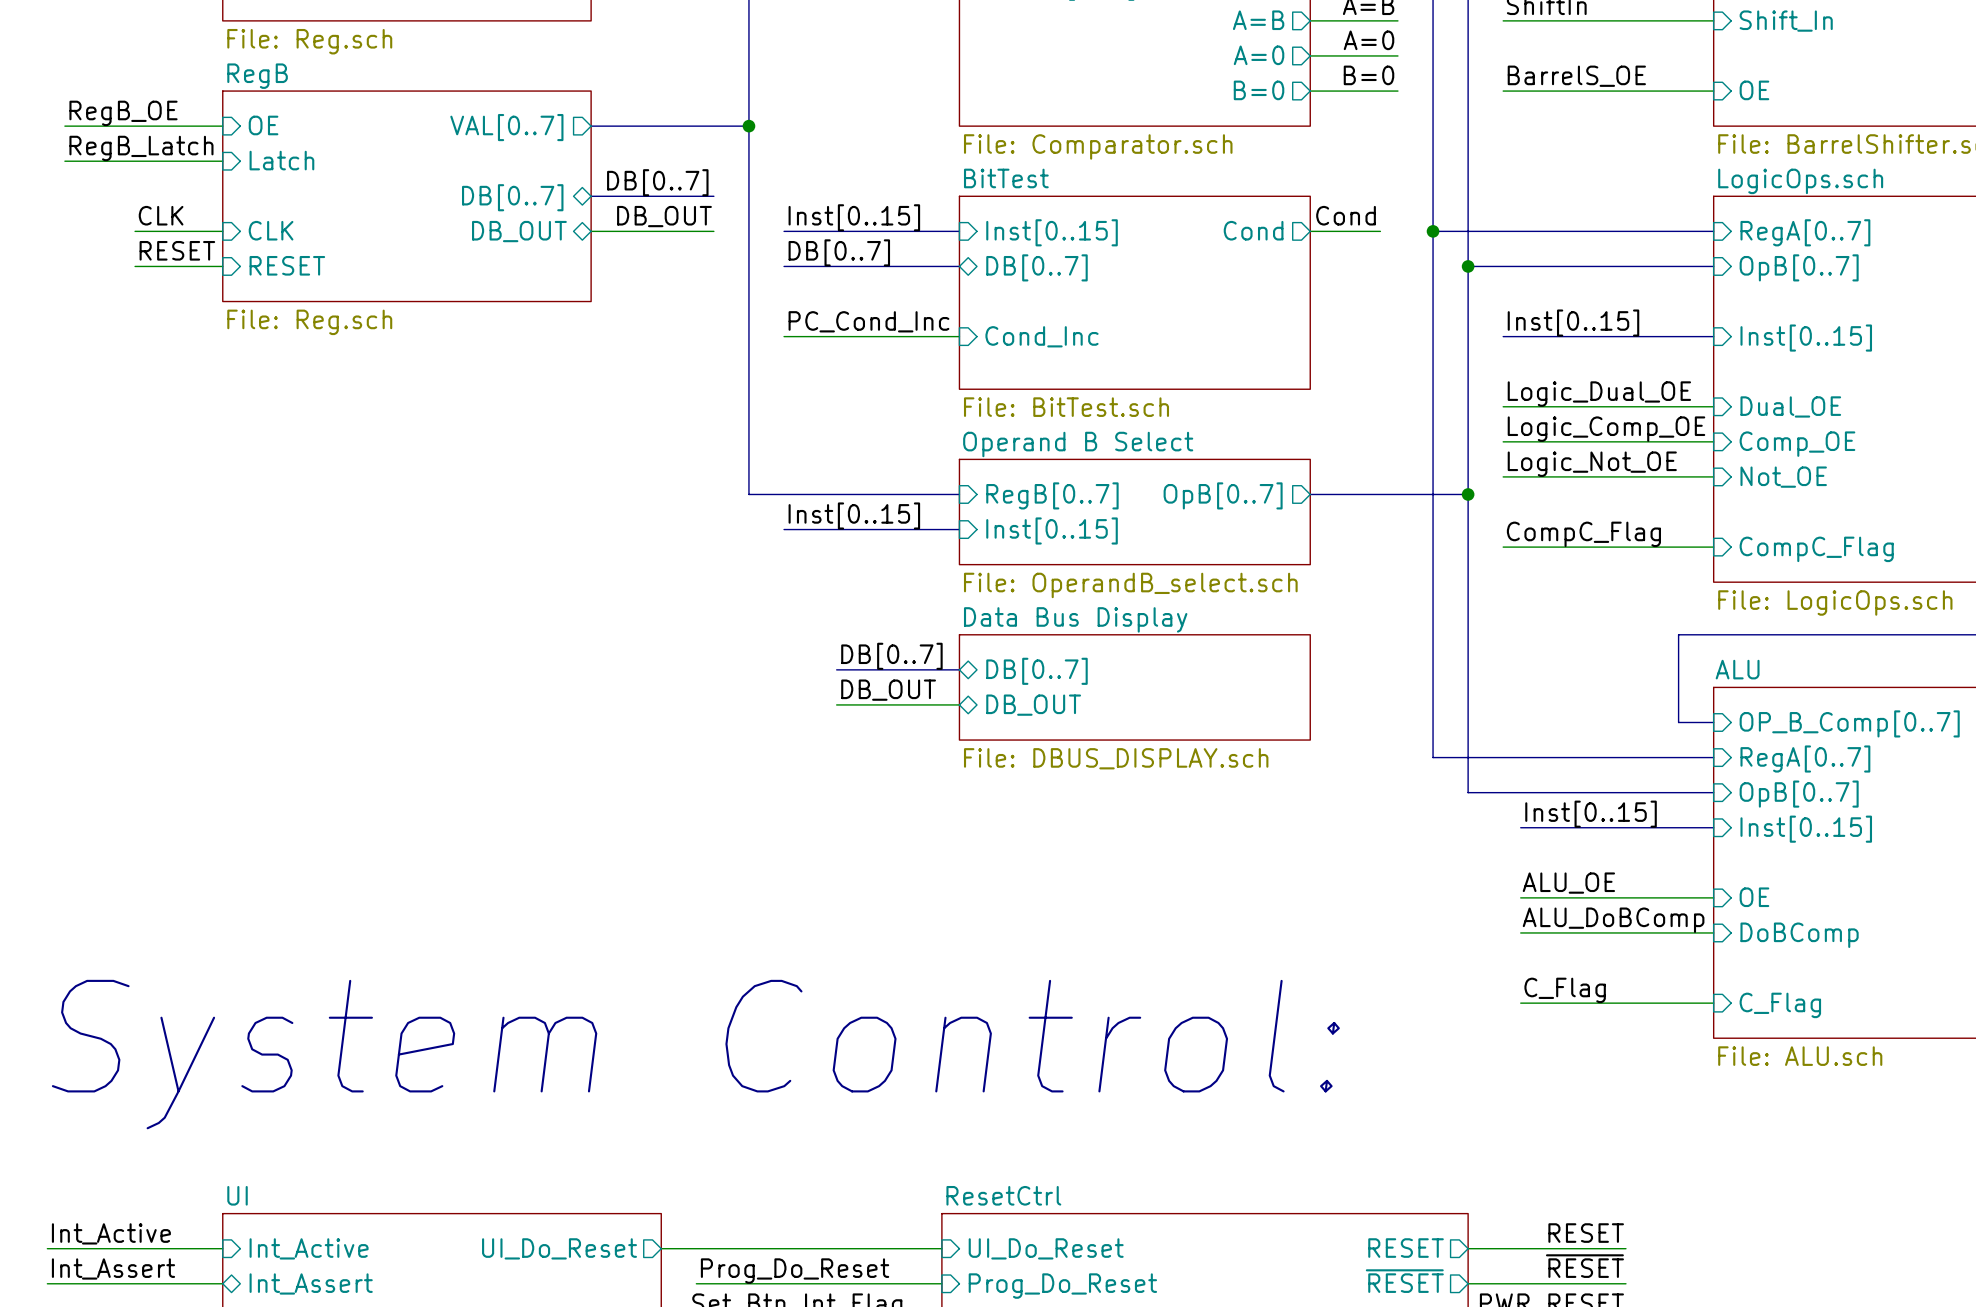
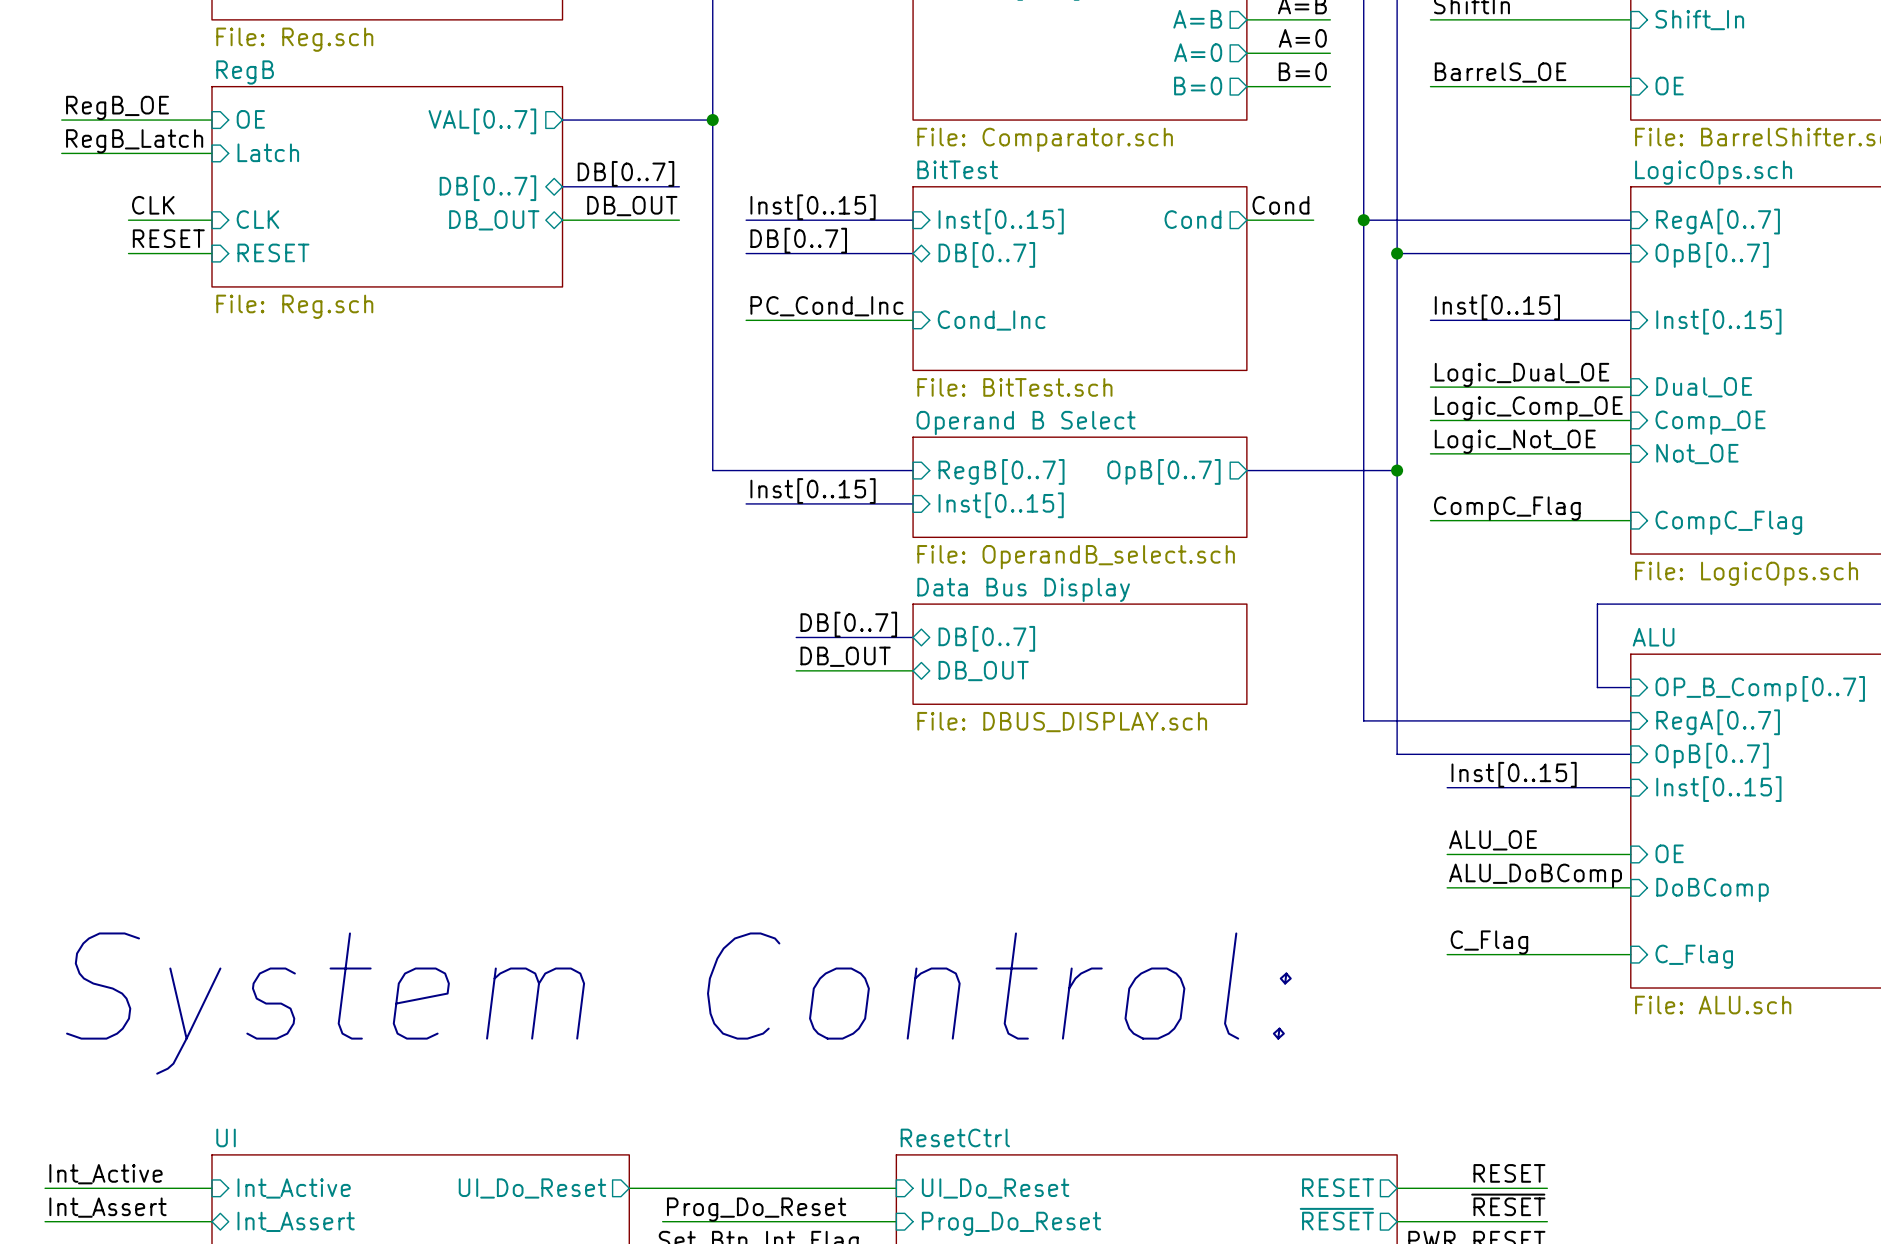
text position: System Control: (695, 1054) -> System Control: (678, 1003)

